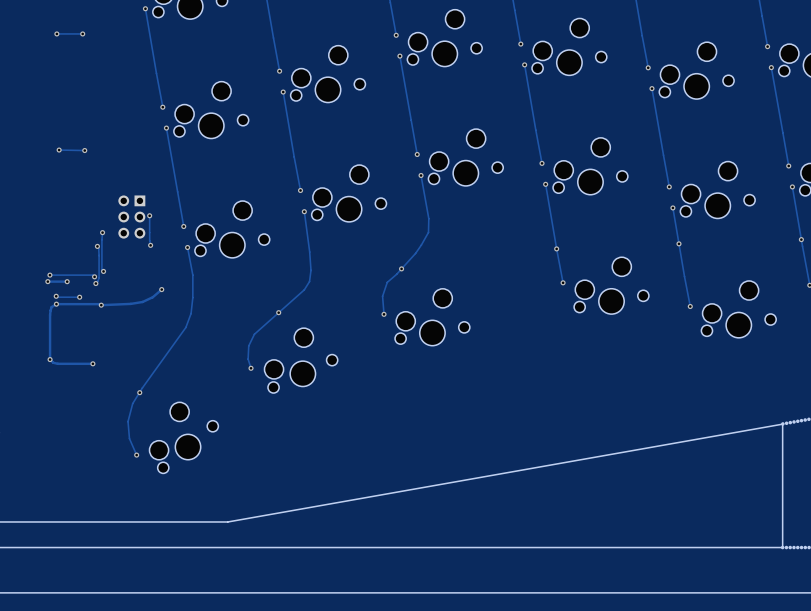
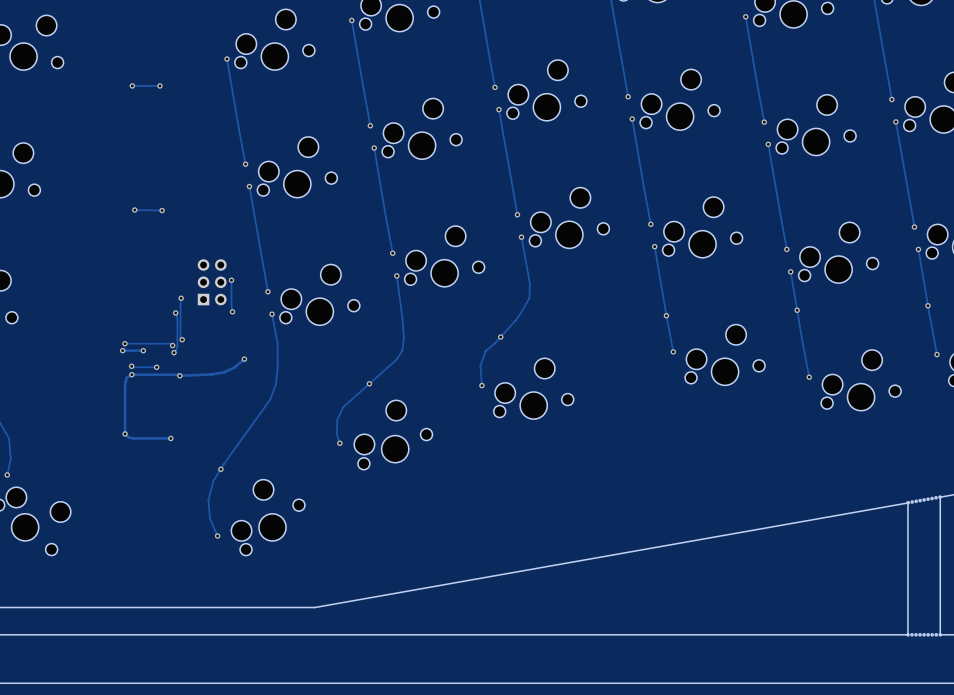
part rotation: 0° (131, 217) -> 180° (212, 282)

